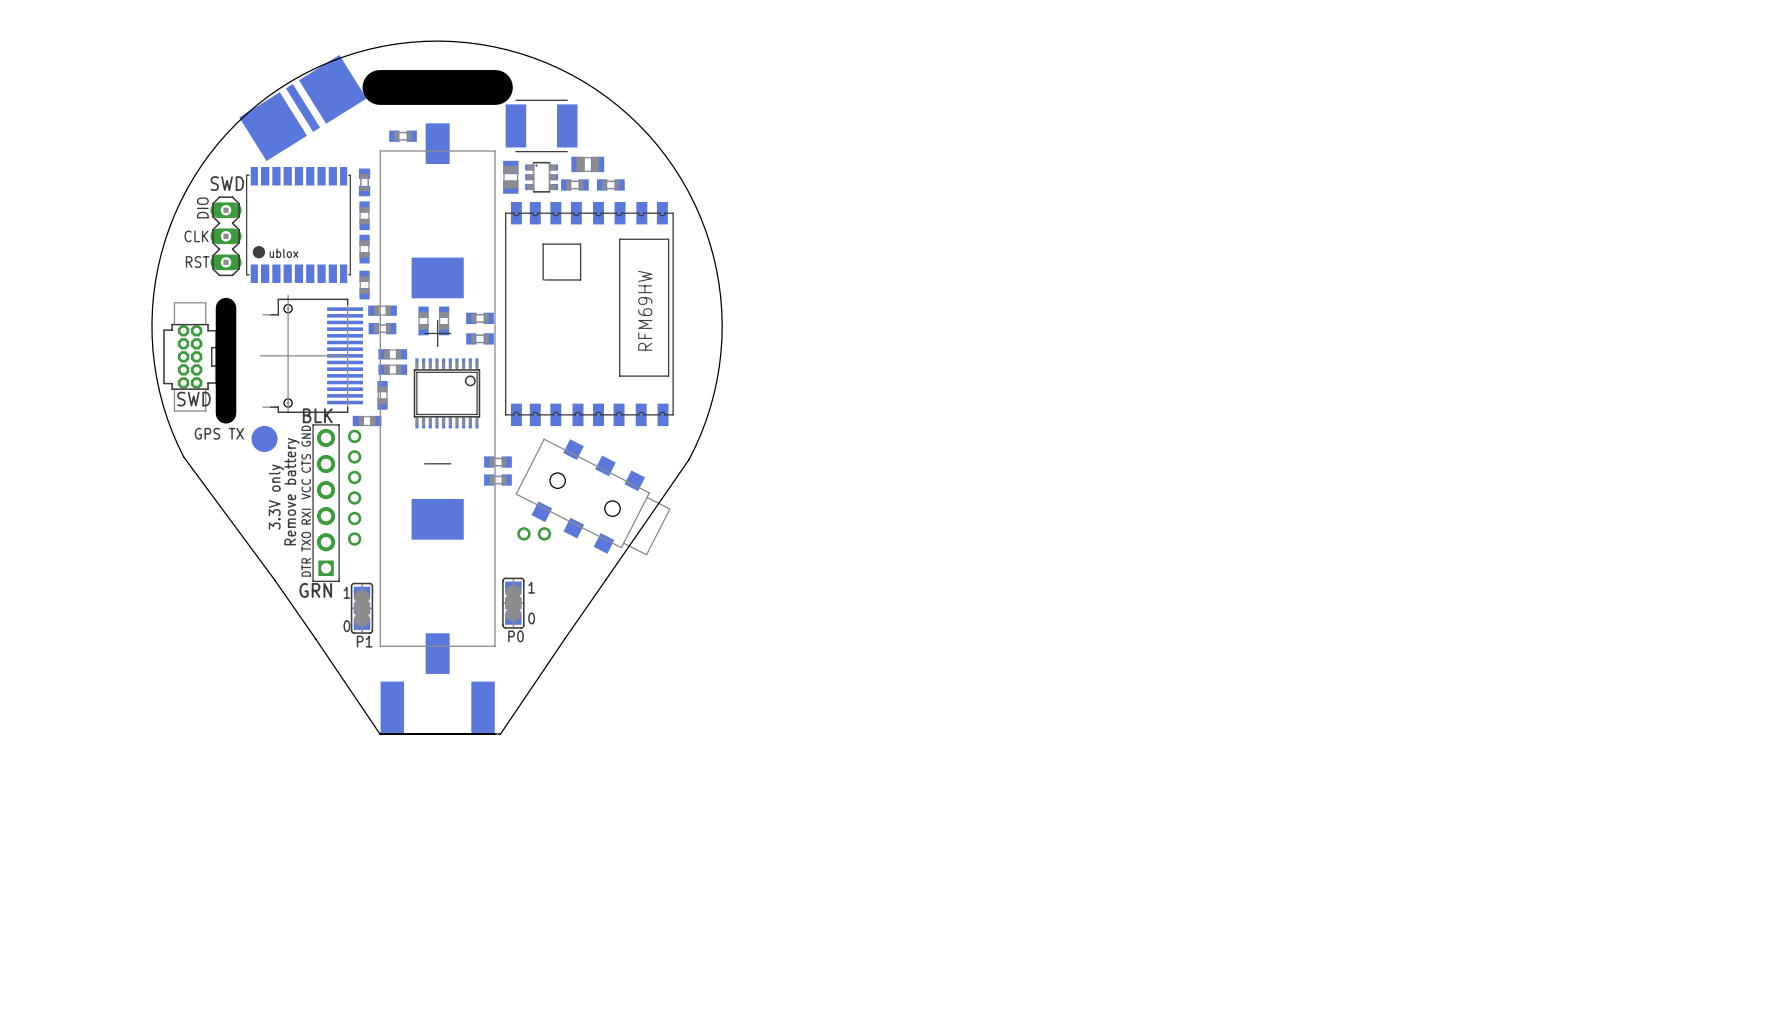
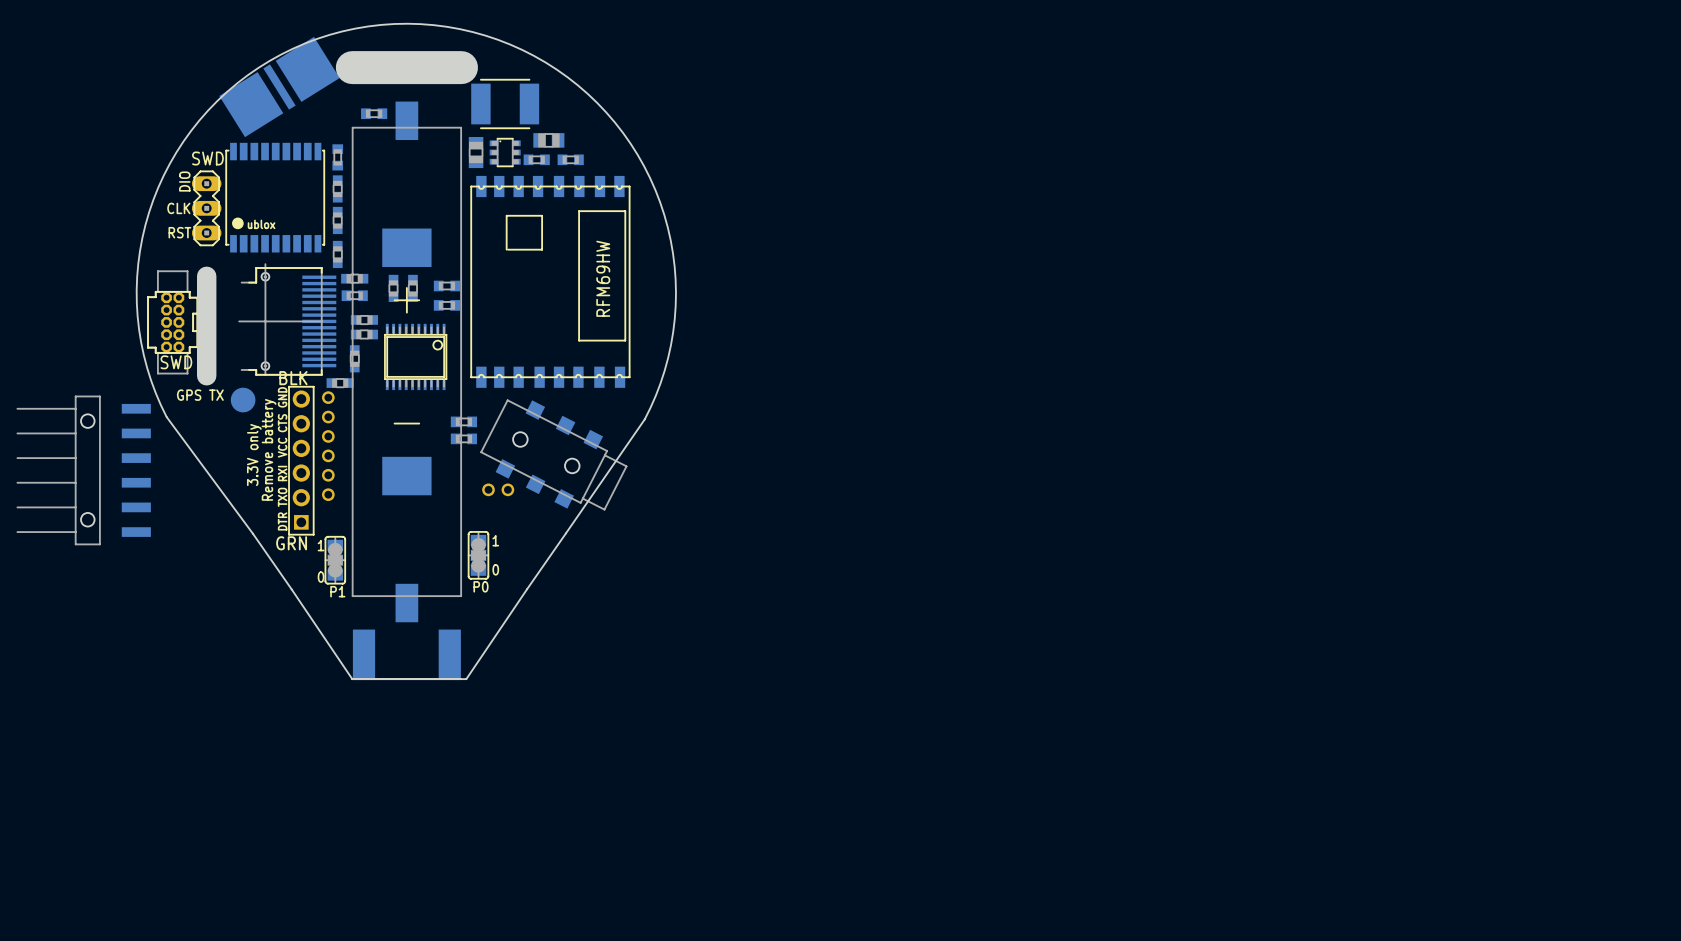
part: none -> (83, 470)

